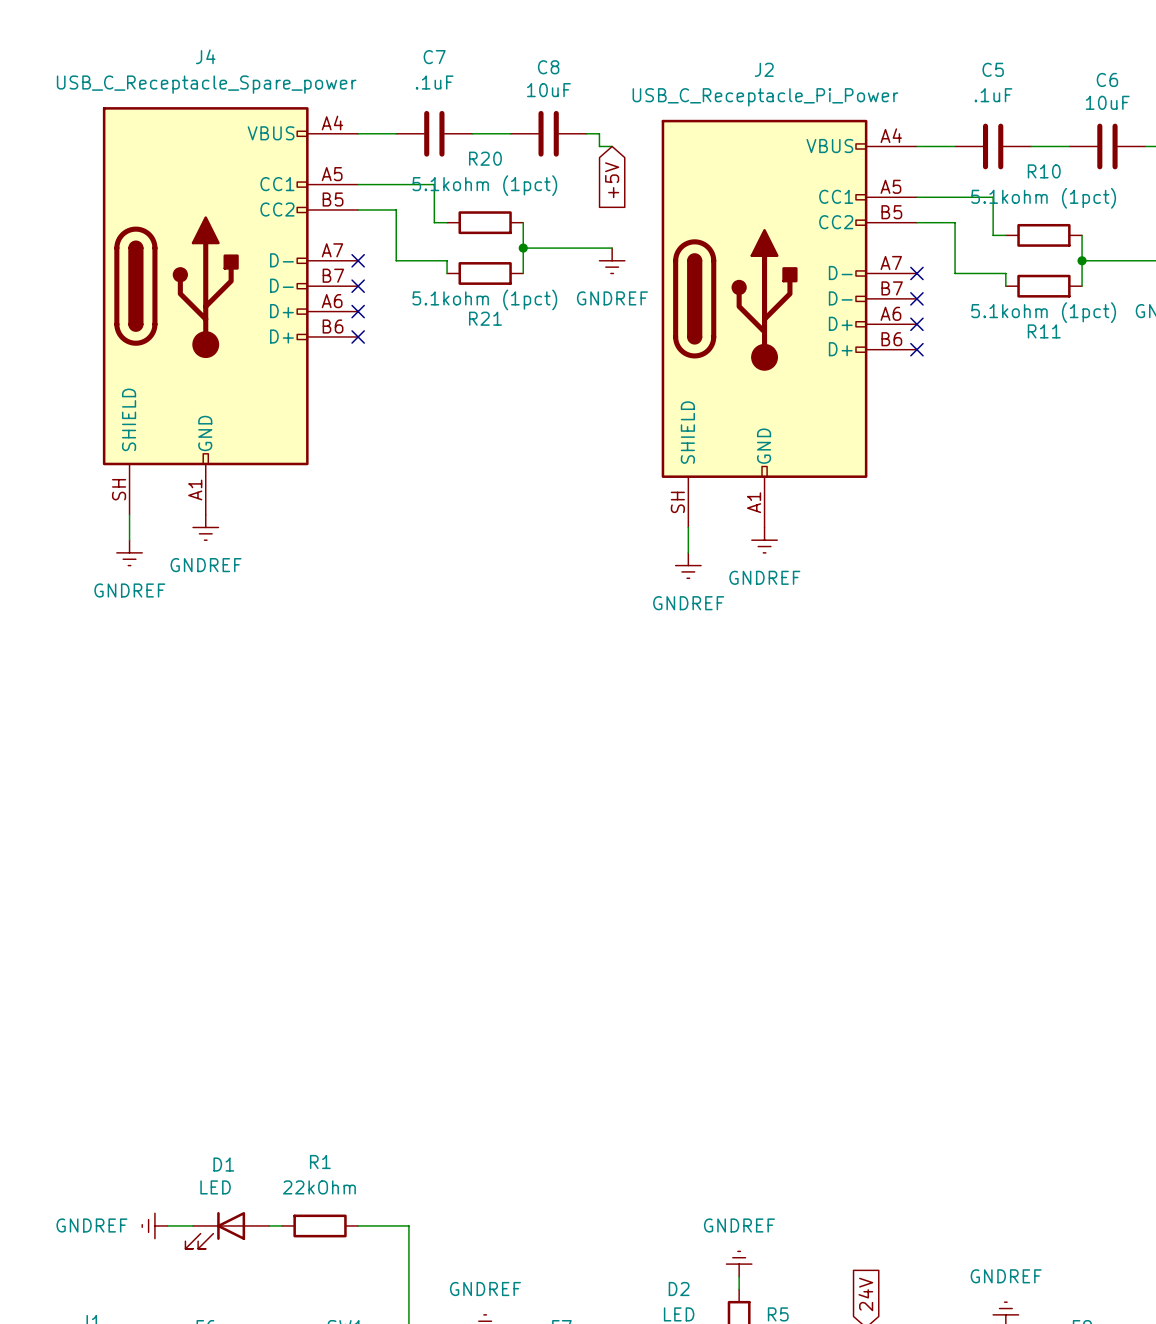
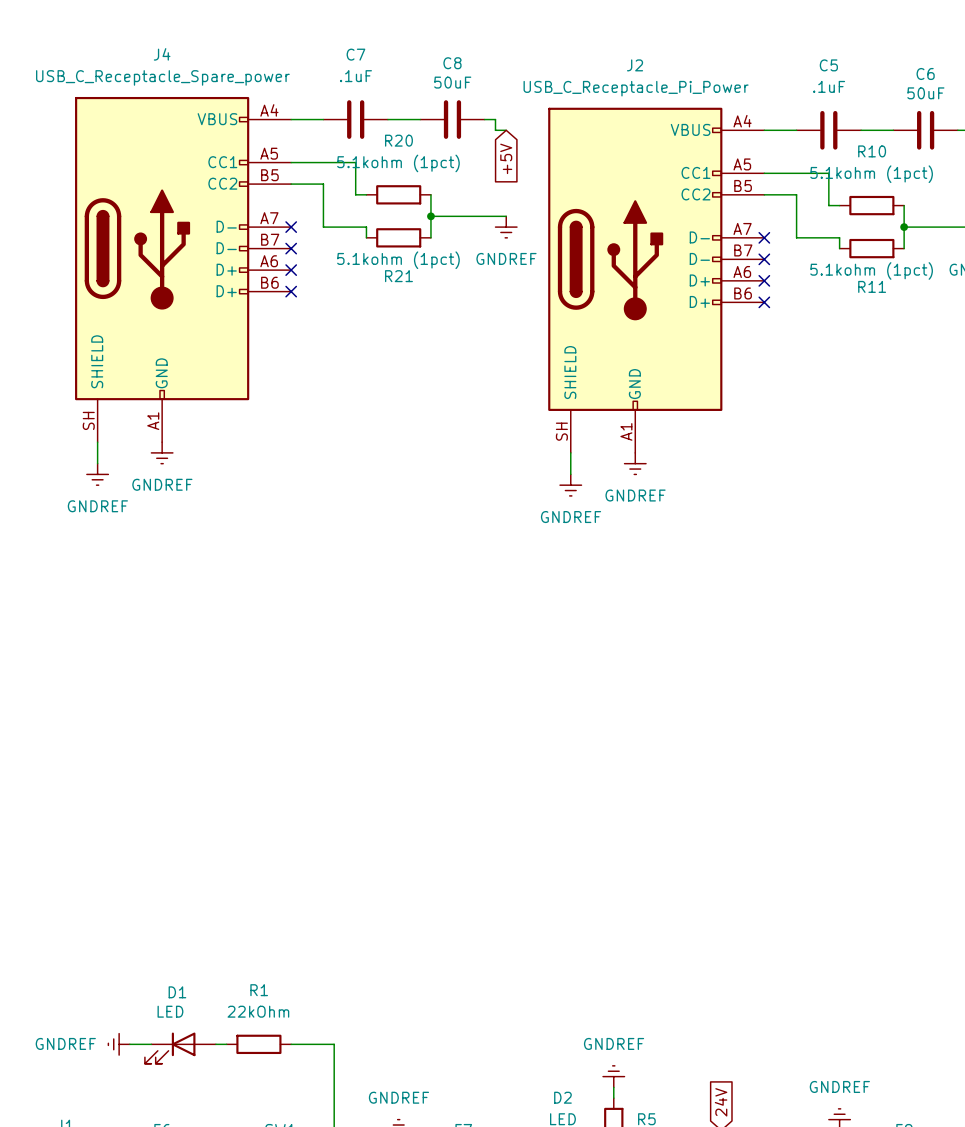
C8 value: 10uF (548, 90) -> 50uF (452, 82)
C6 value: 10uF (1107, 102) -> 50uF (925, 93)

